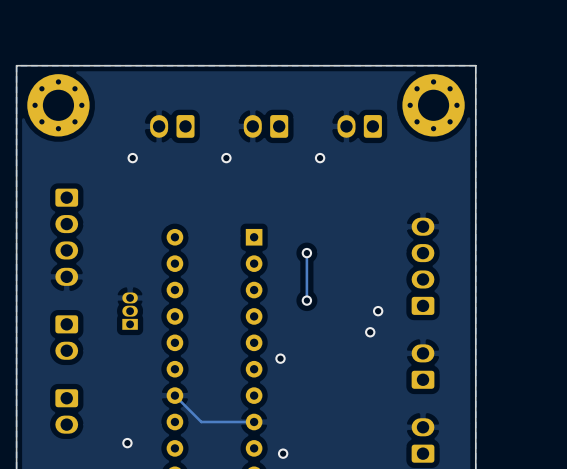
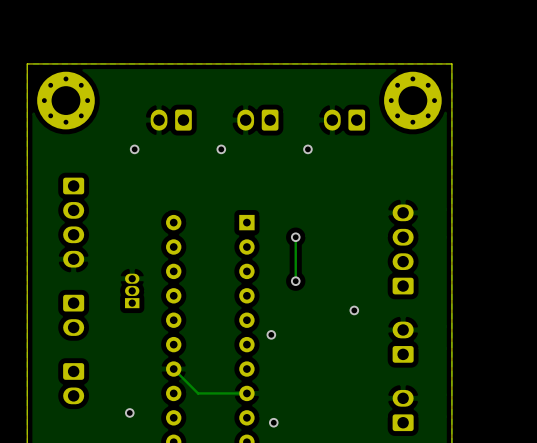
via: (378, 311) -> none

